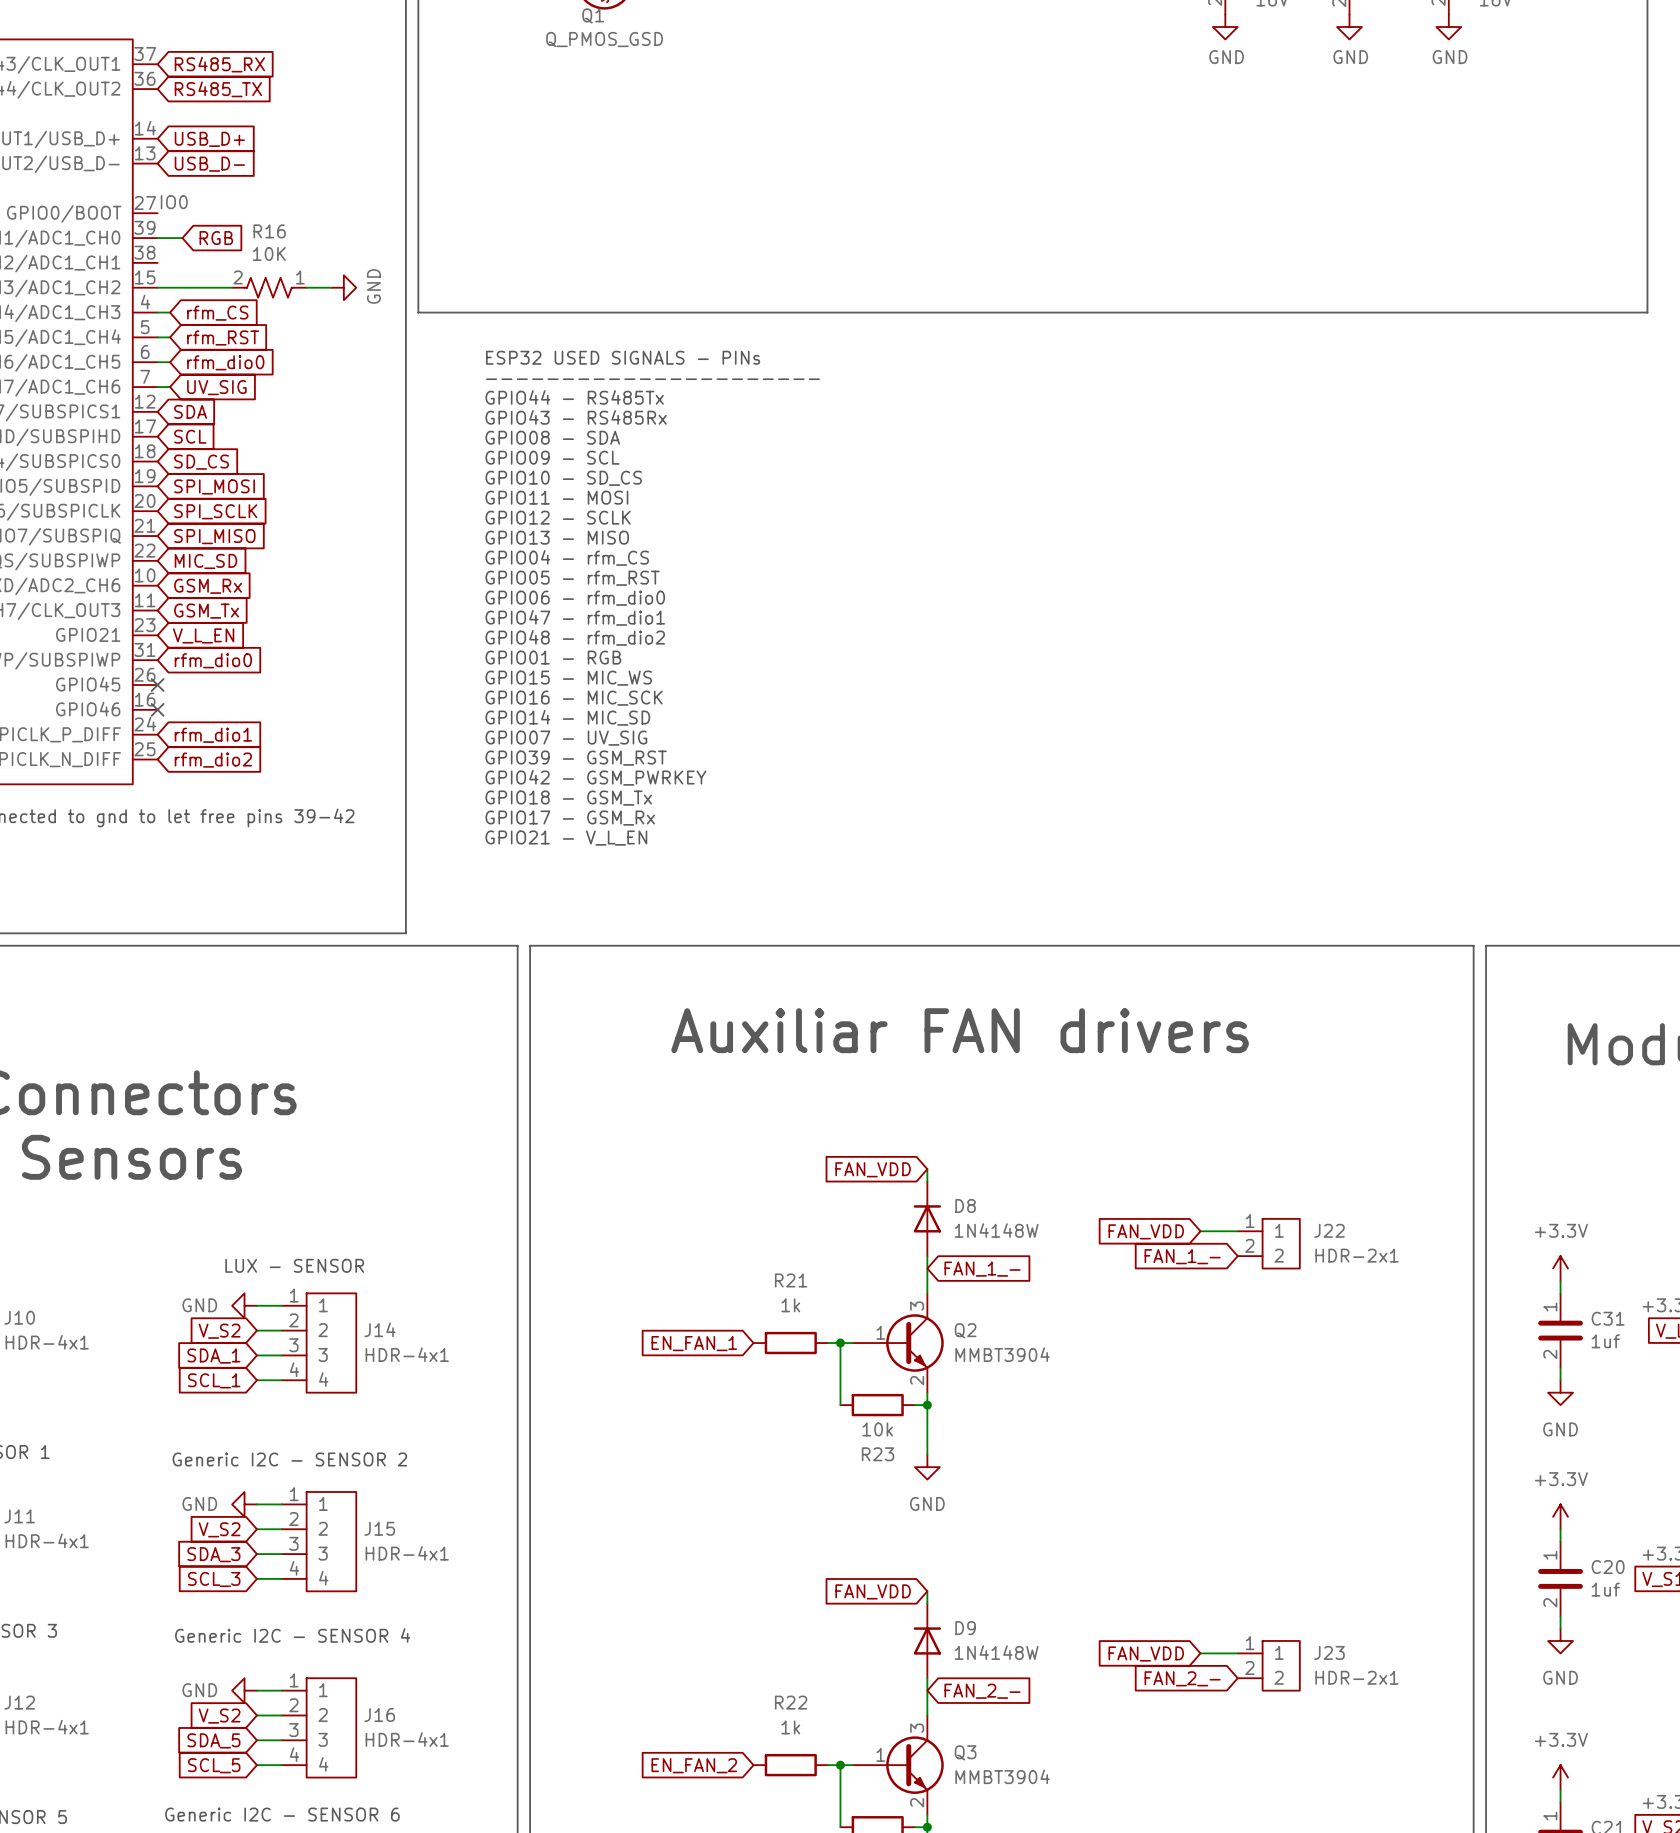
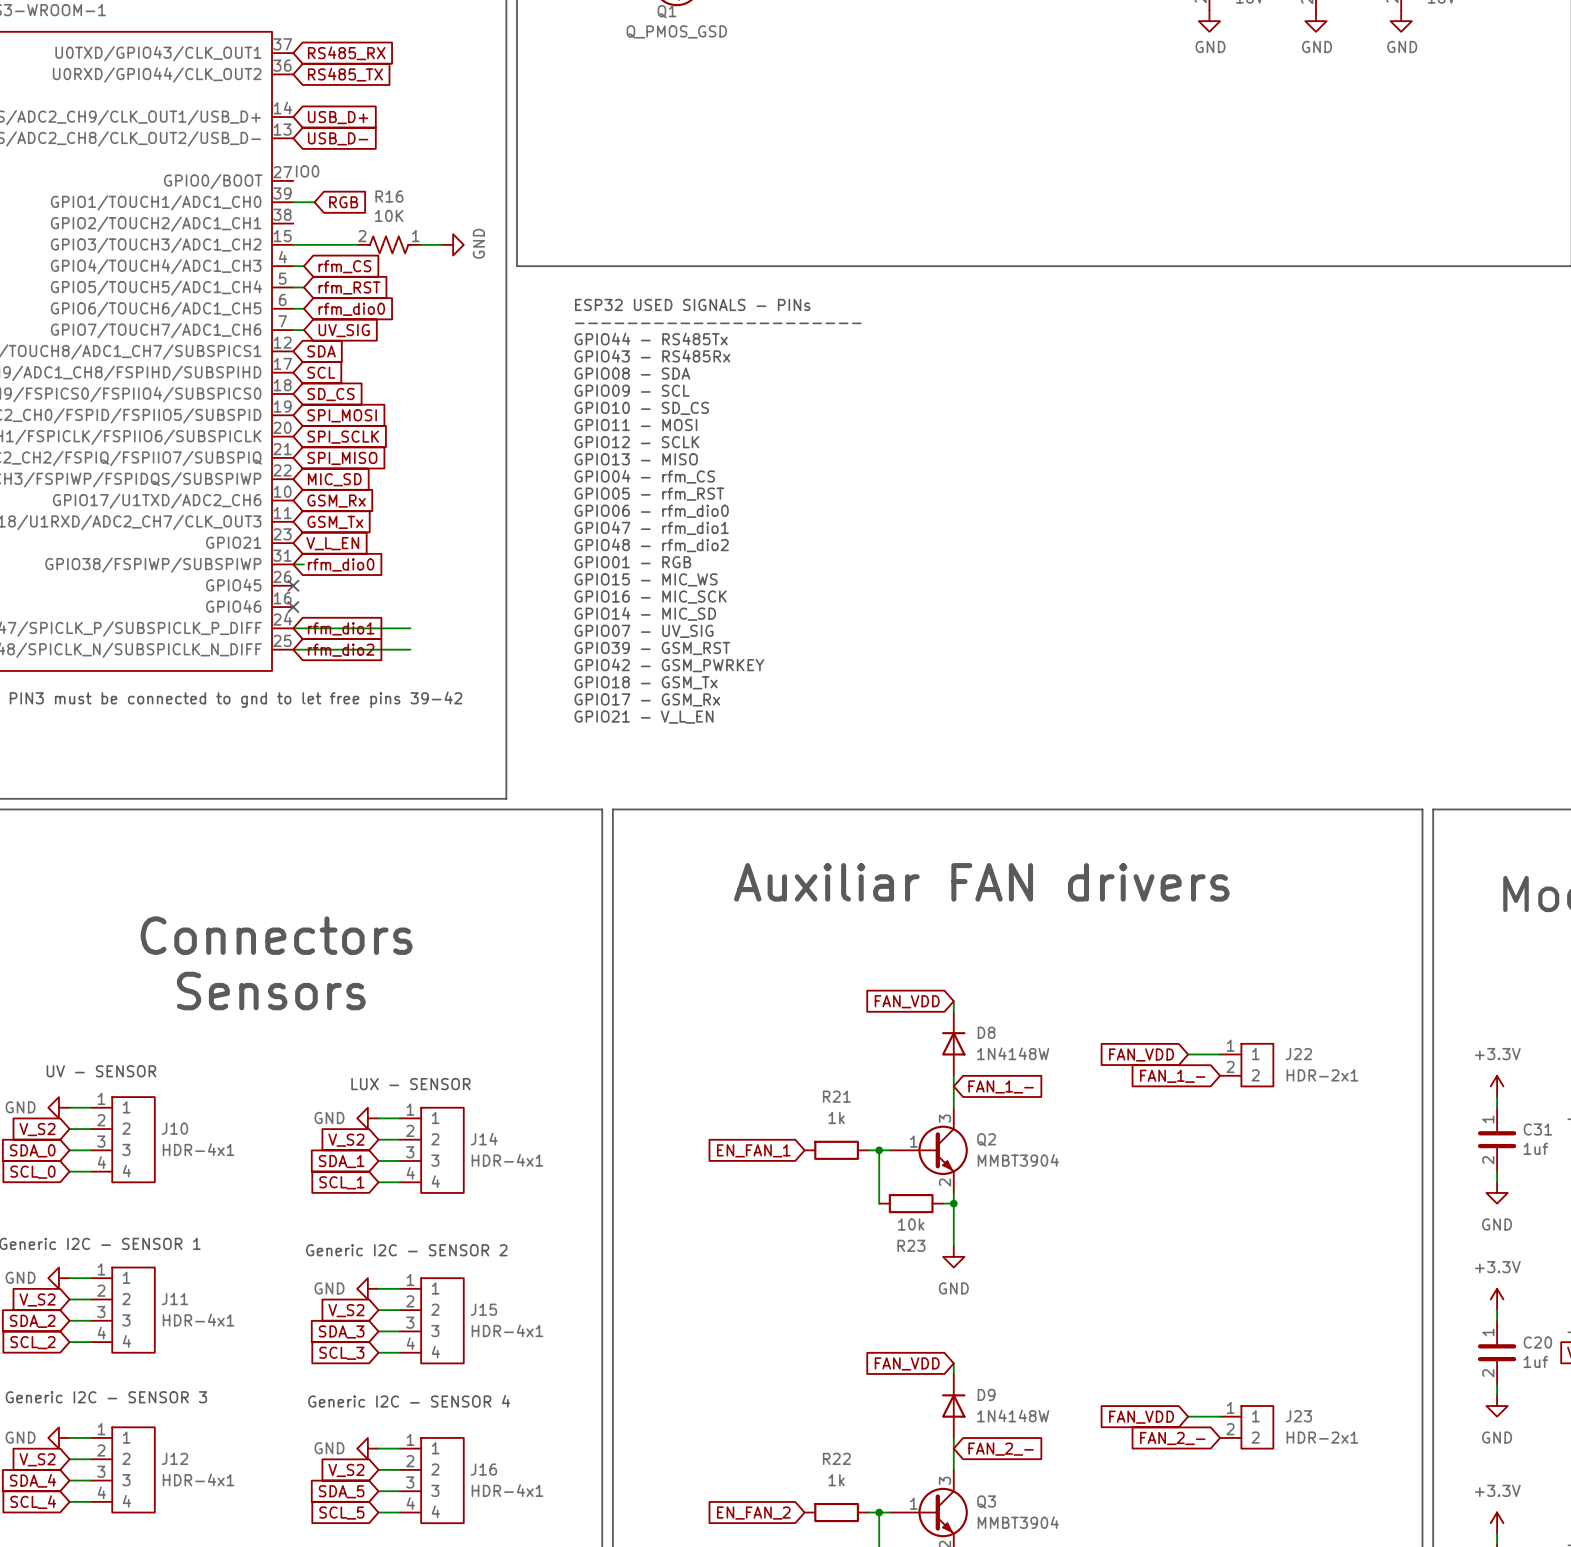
wire: none -> (293, 564) (303, 564)
wire: none -> (293, 628) (410, 628)
wire: none -> (293, 649) (410, 649)

